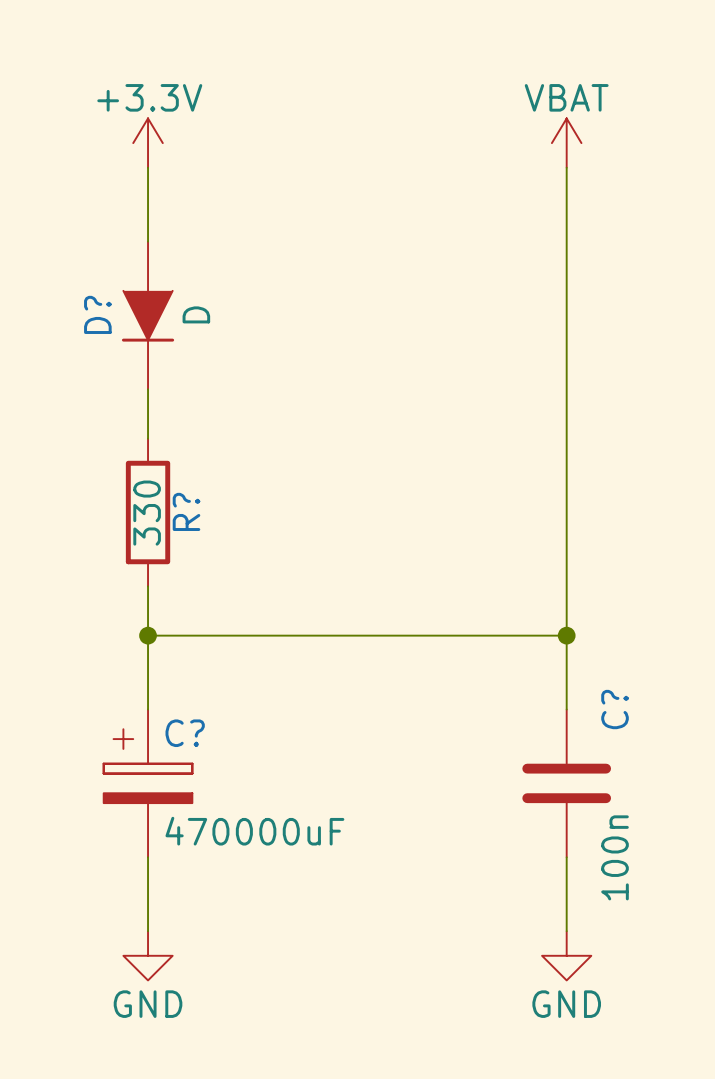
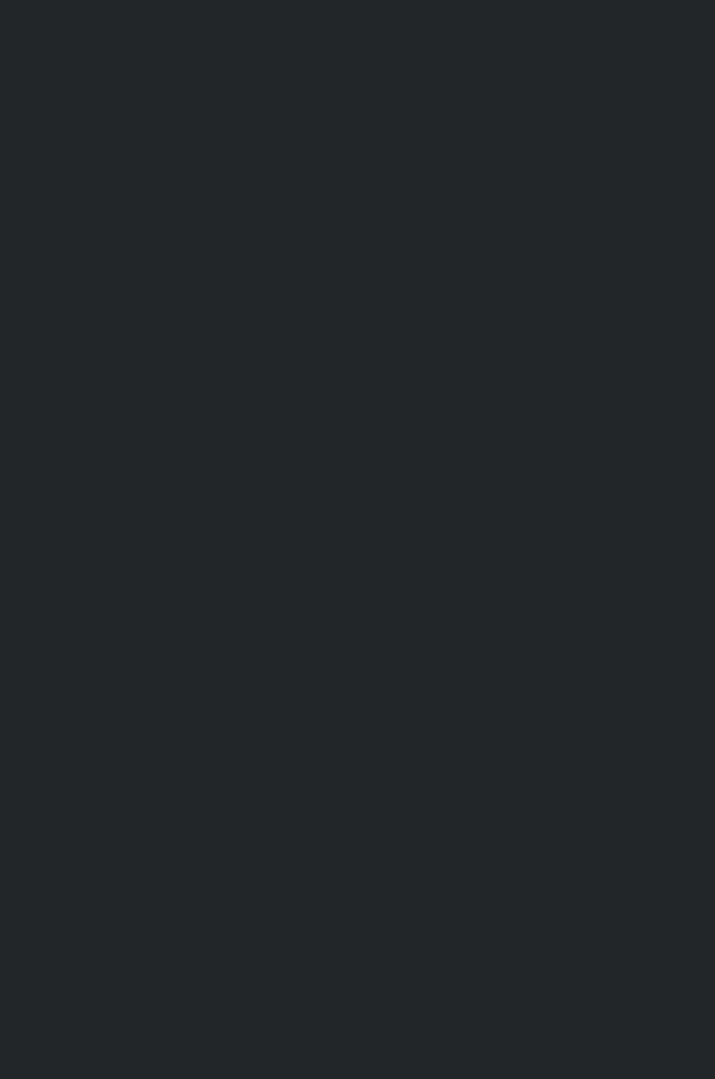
power symbol: +3.3V (148, 143) -> none
power symbol: VBAT (566, 143) -> none
wire: (148, 167) (148, 241) -> none
wire: (566, 167) (566, 709) -> none
D?: D (148, 315) -> none
wire: (148, 389) (148, 438) -> none
R?: 330 (148, 512) -> none
wire: (148, 586) (148, 709) -> none
wire: (148, 635) (566, 635) -> none
junction: (148, 635) -> none
junction: (566, 635) -> none
C?: 470000uF (148, 783) -> none
C?: 100n (566, 783) -> none
wire: (148, 857) (148, 931) -> none
wire: (566, 857) (566, 931) -> none
power symbol: GND (148, 955) -> none
power symbol: GND (566, 955) -> none

